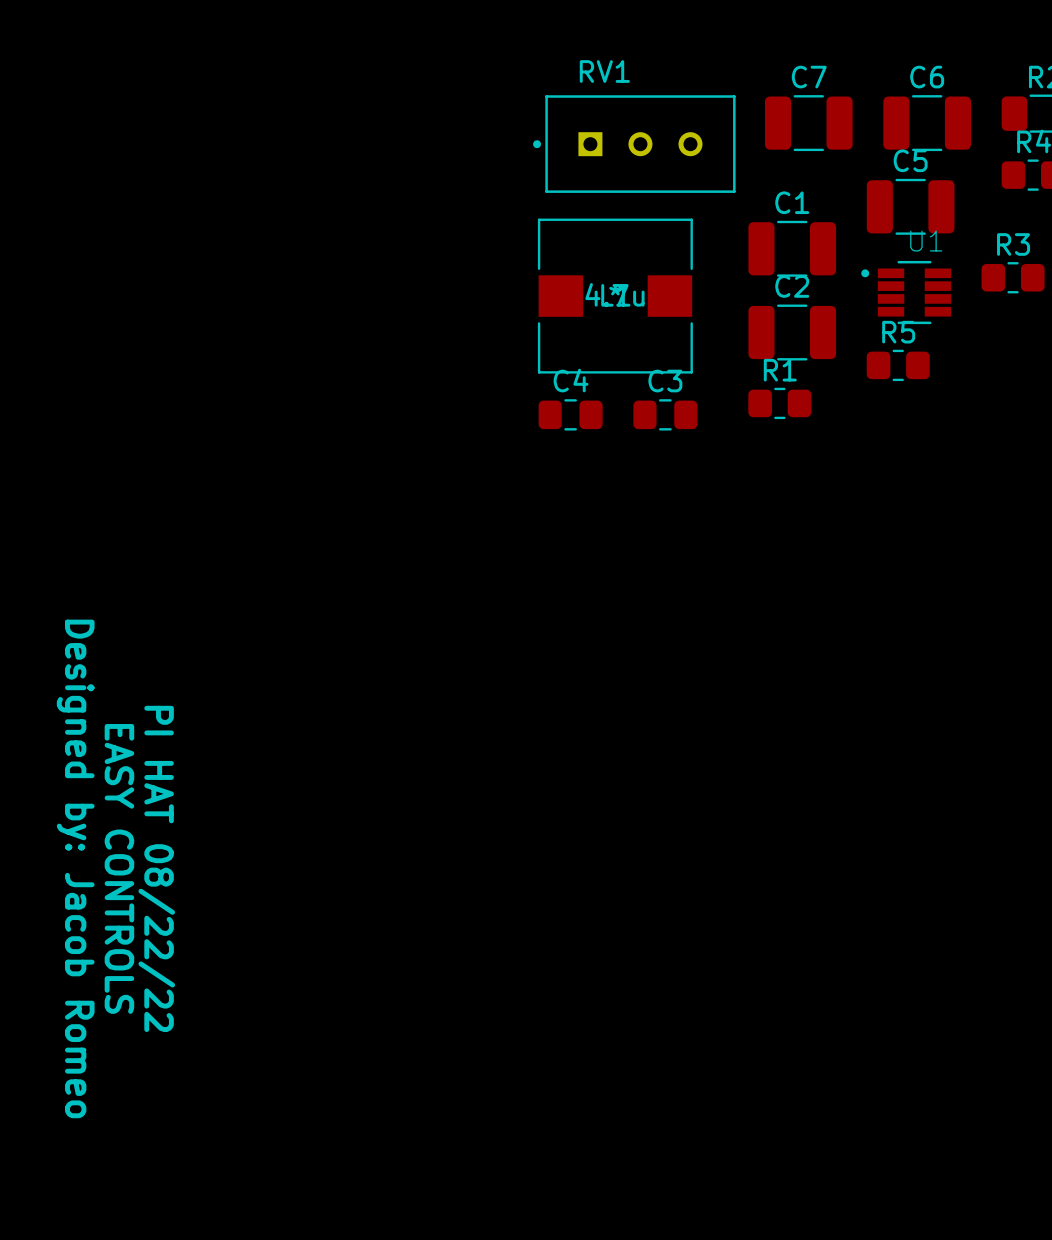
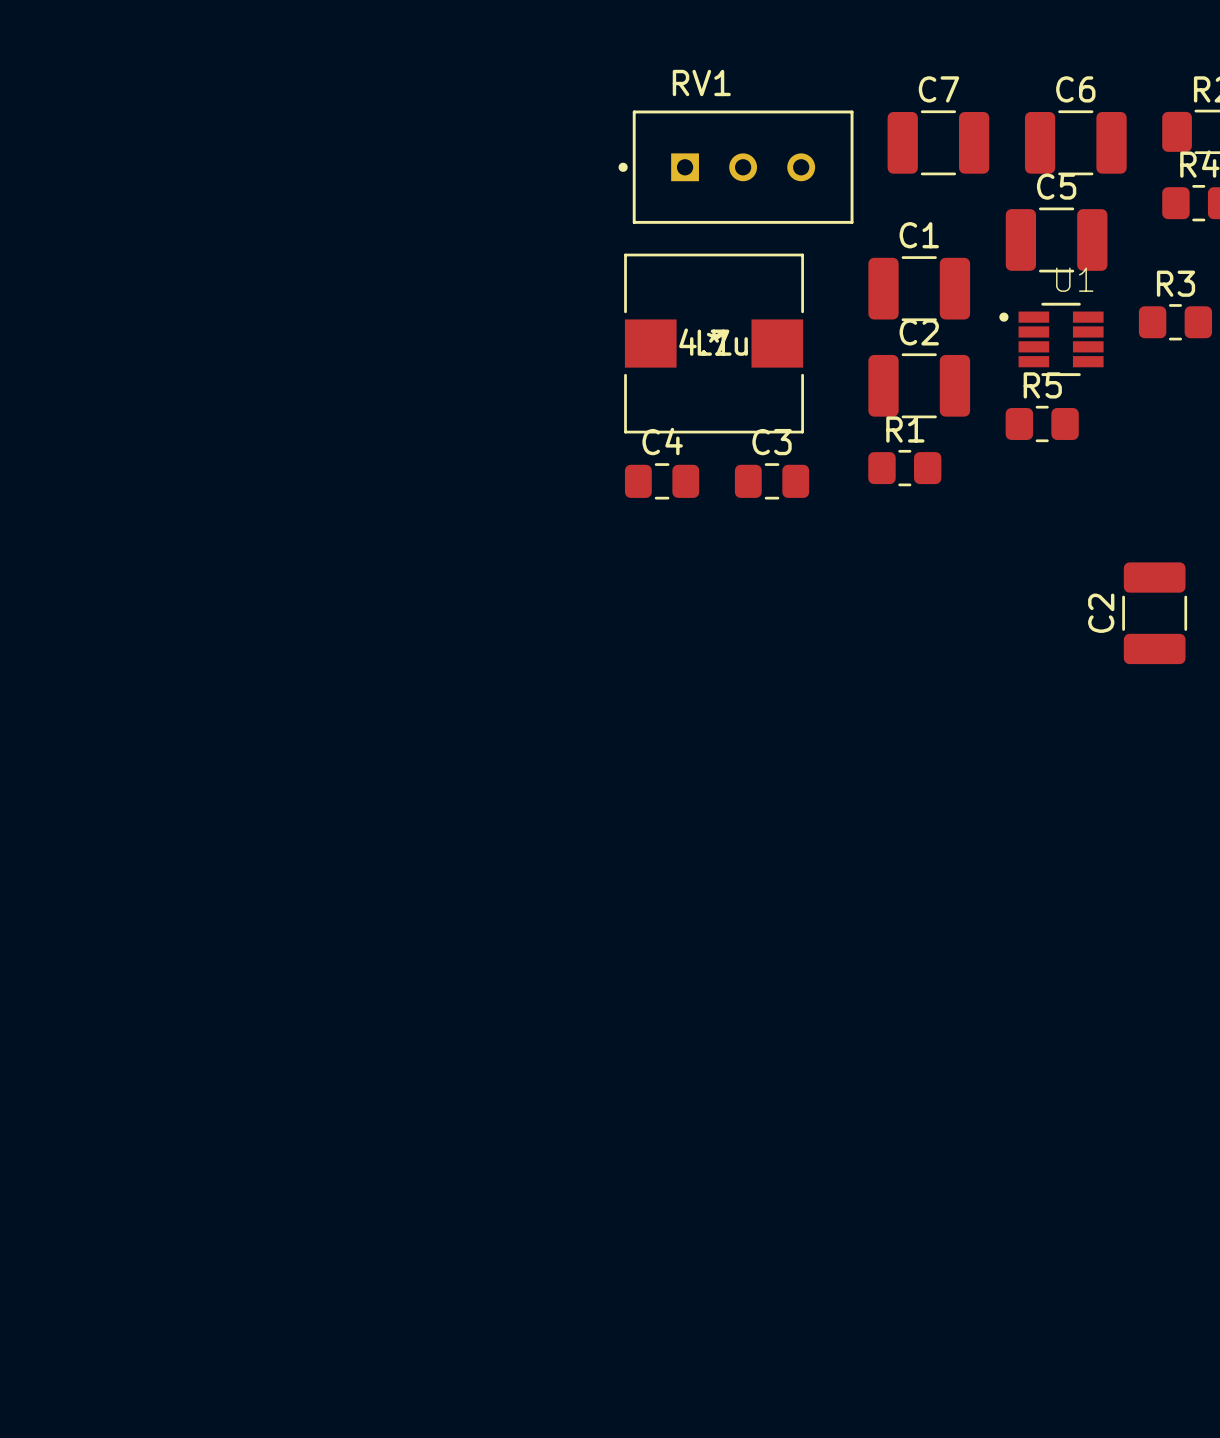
C2: none -> (1154, 613)
text: Designed by: Jacob Romeo (75, 868) -> none
text: EASY CONTROLS (119, 868) -> none
text: PI HAT 08/22/22 (156, 868) -> none

